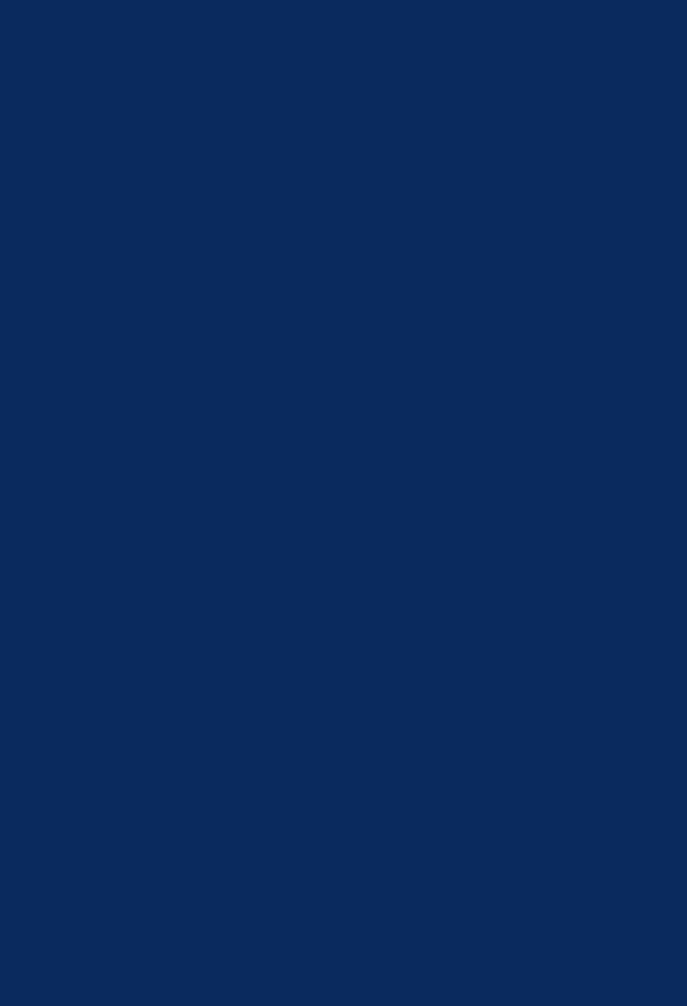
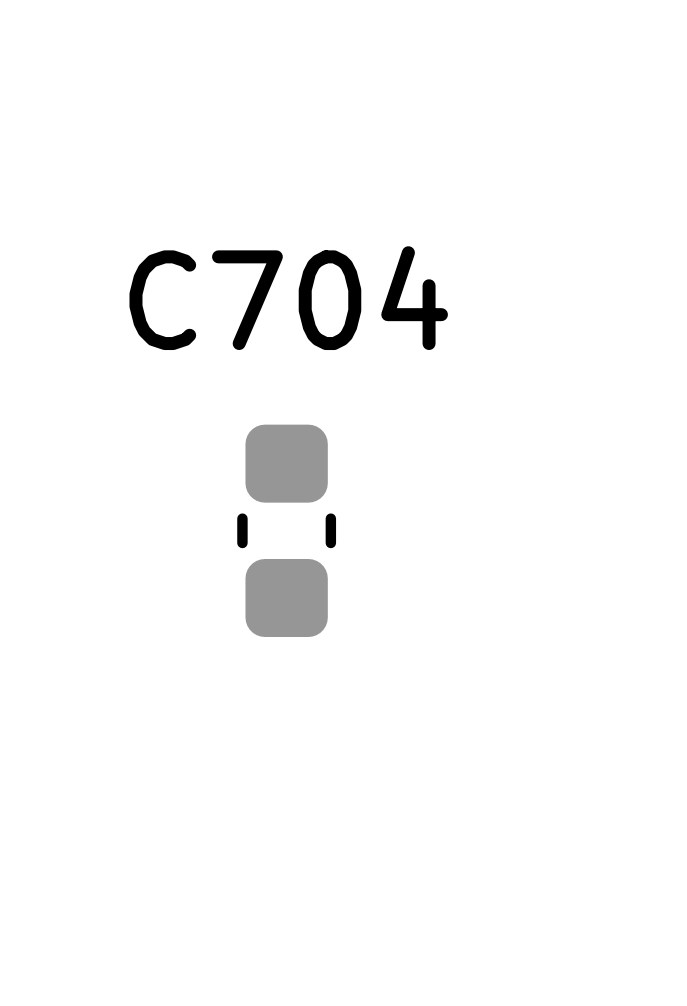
C704: none -> (286, 530)

